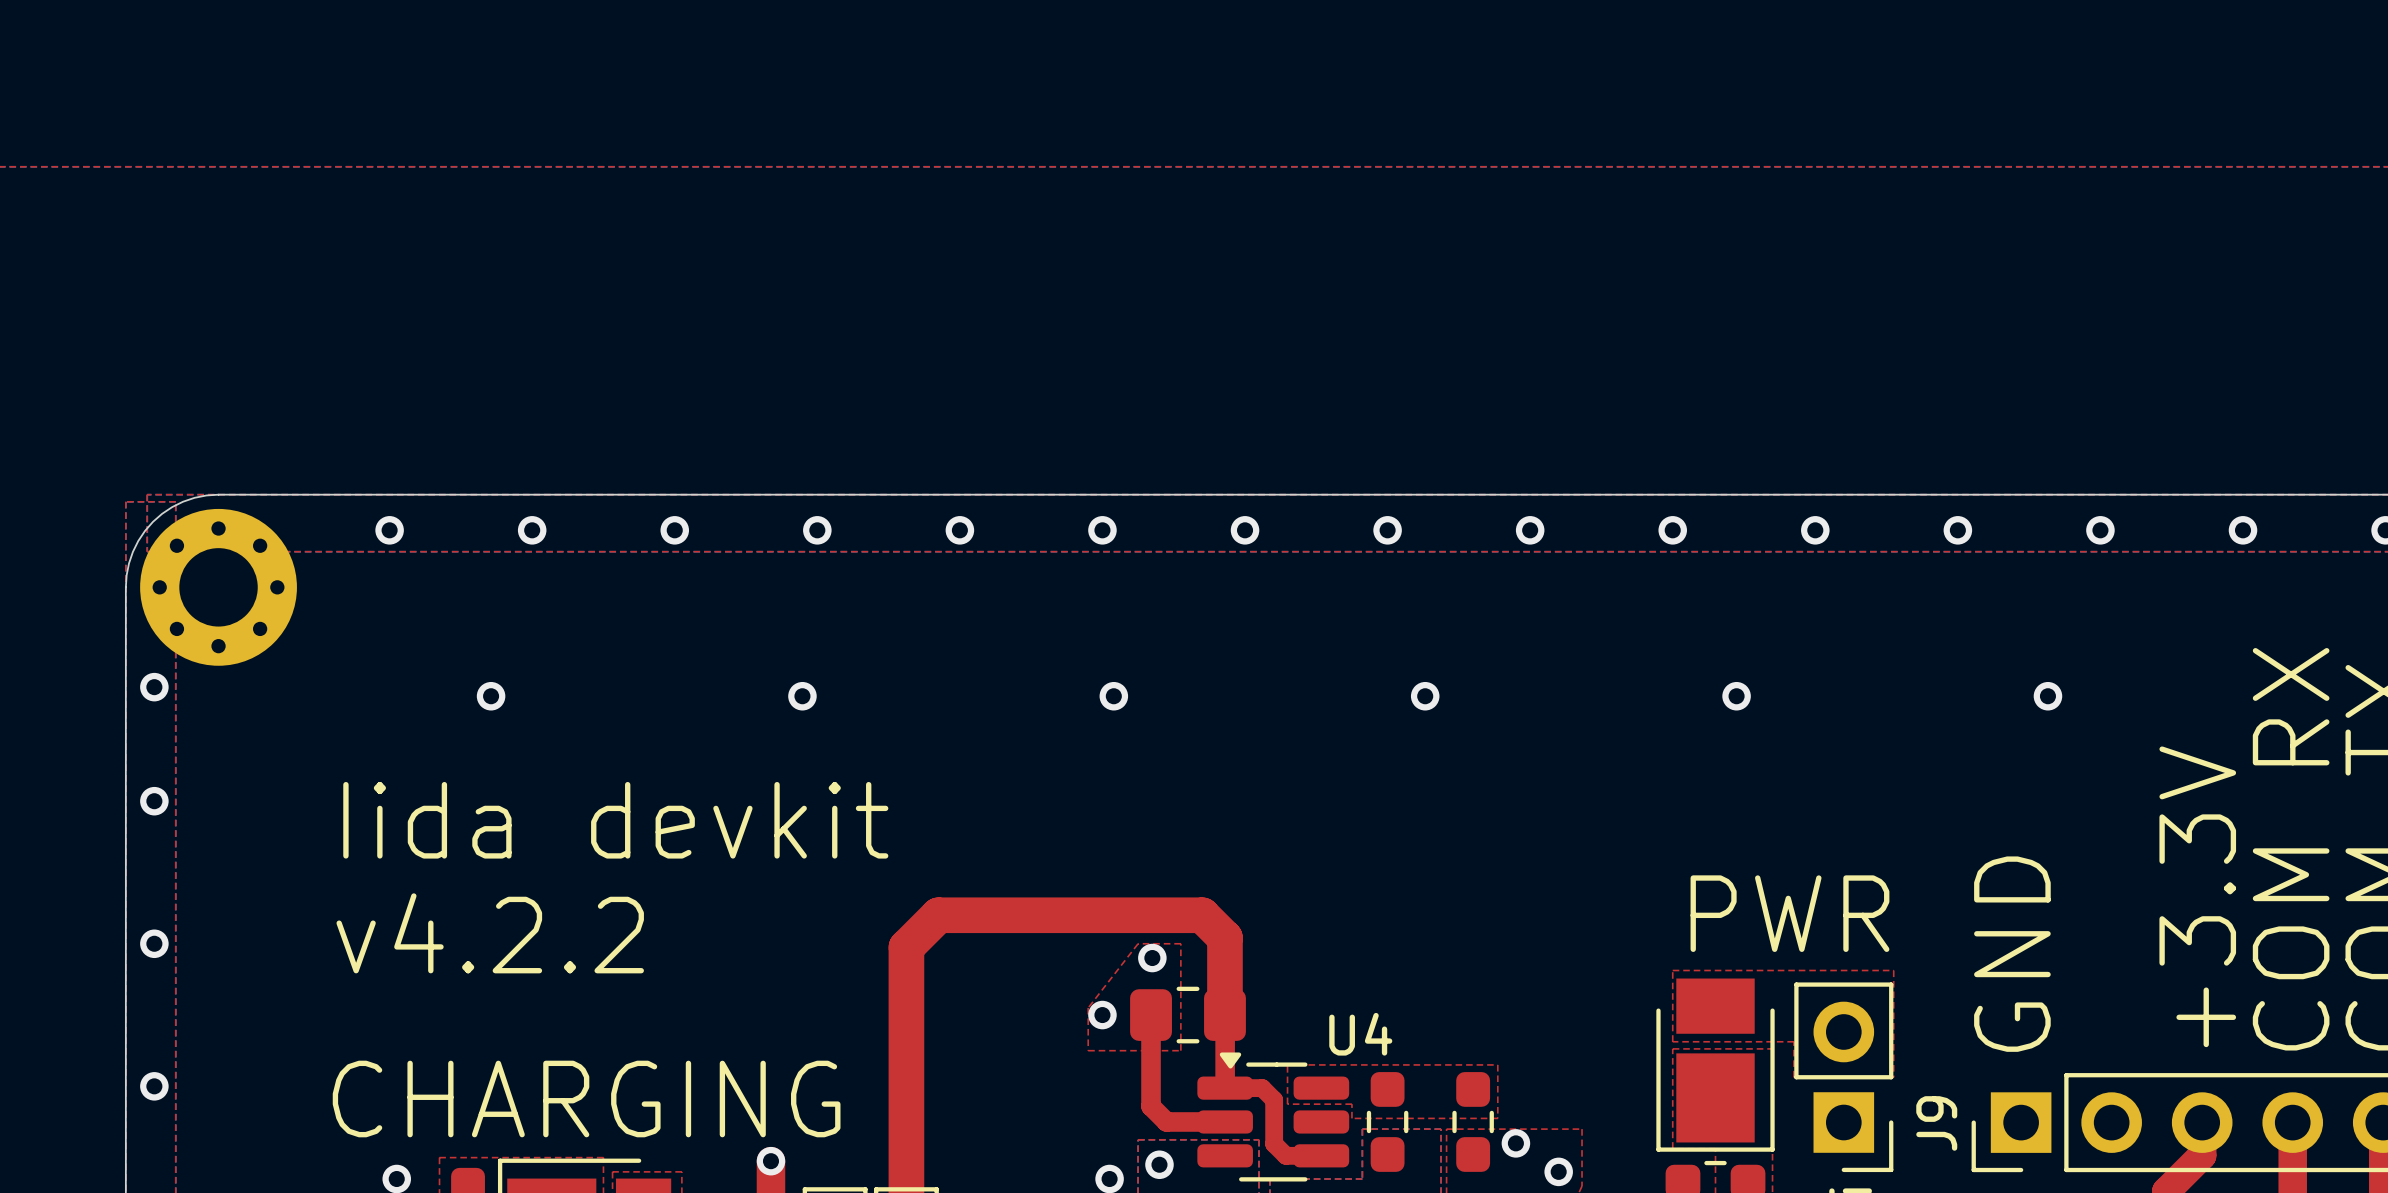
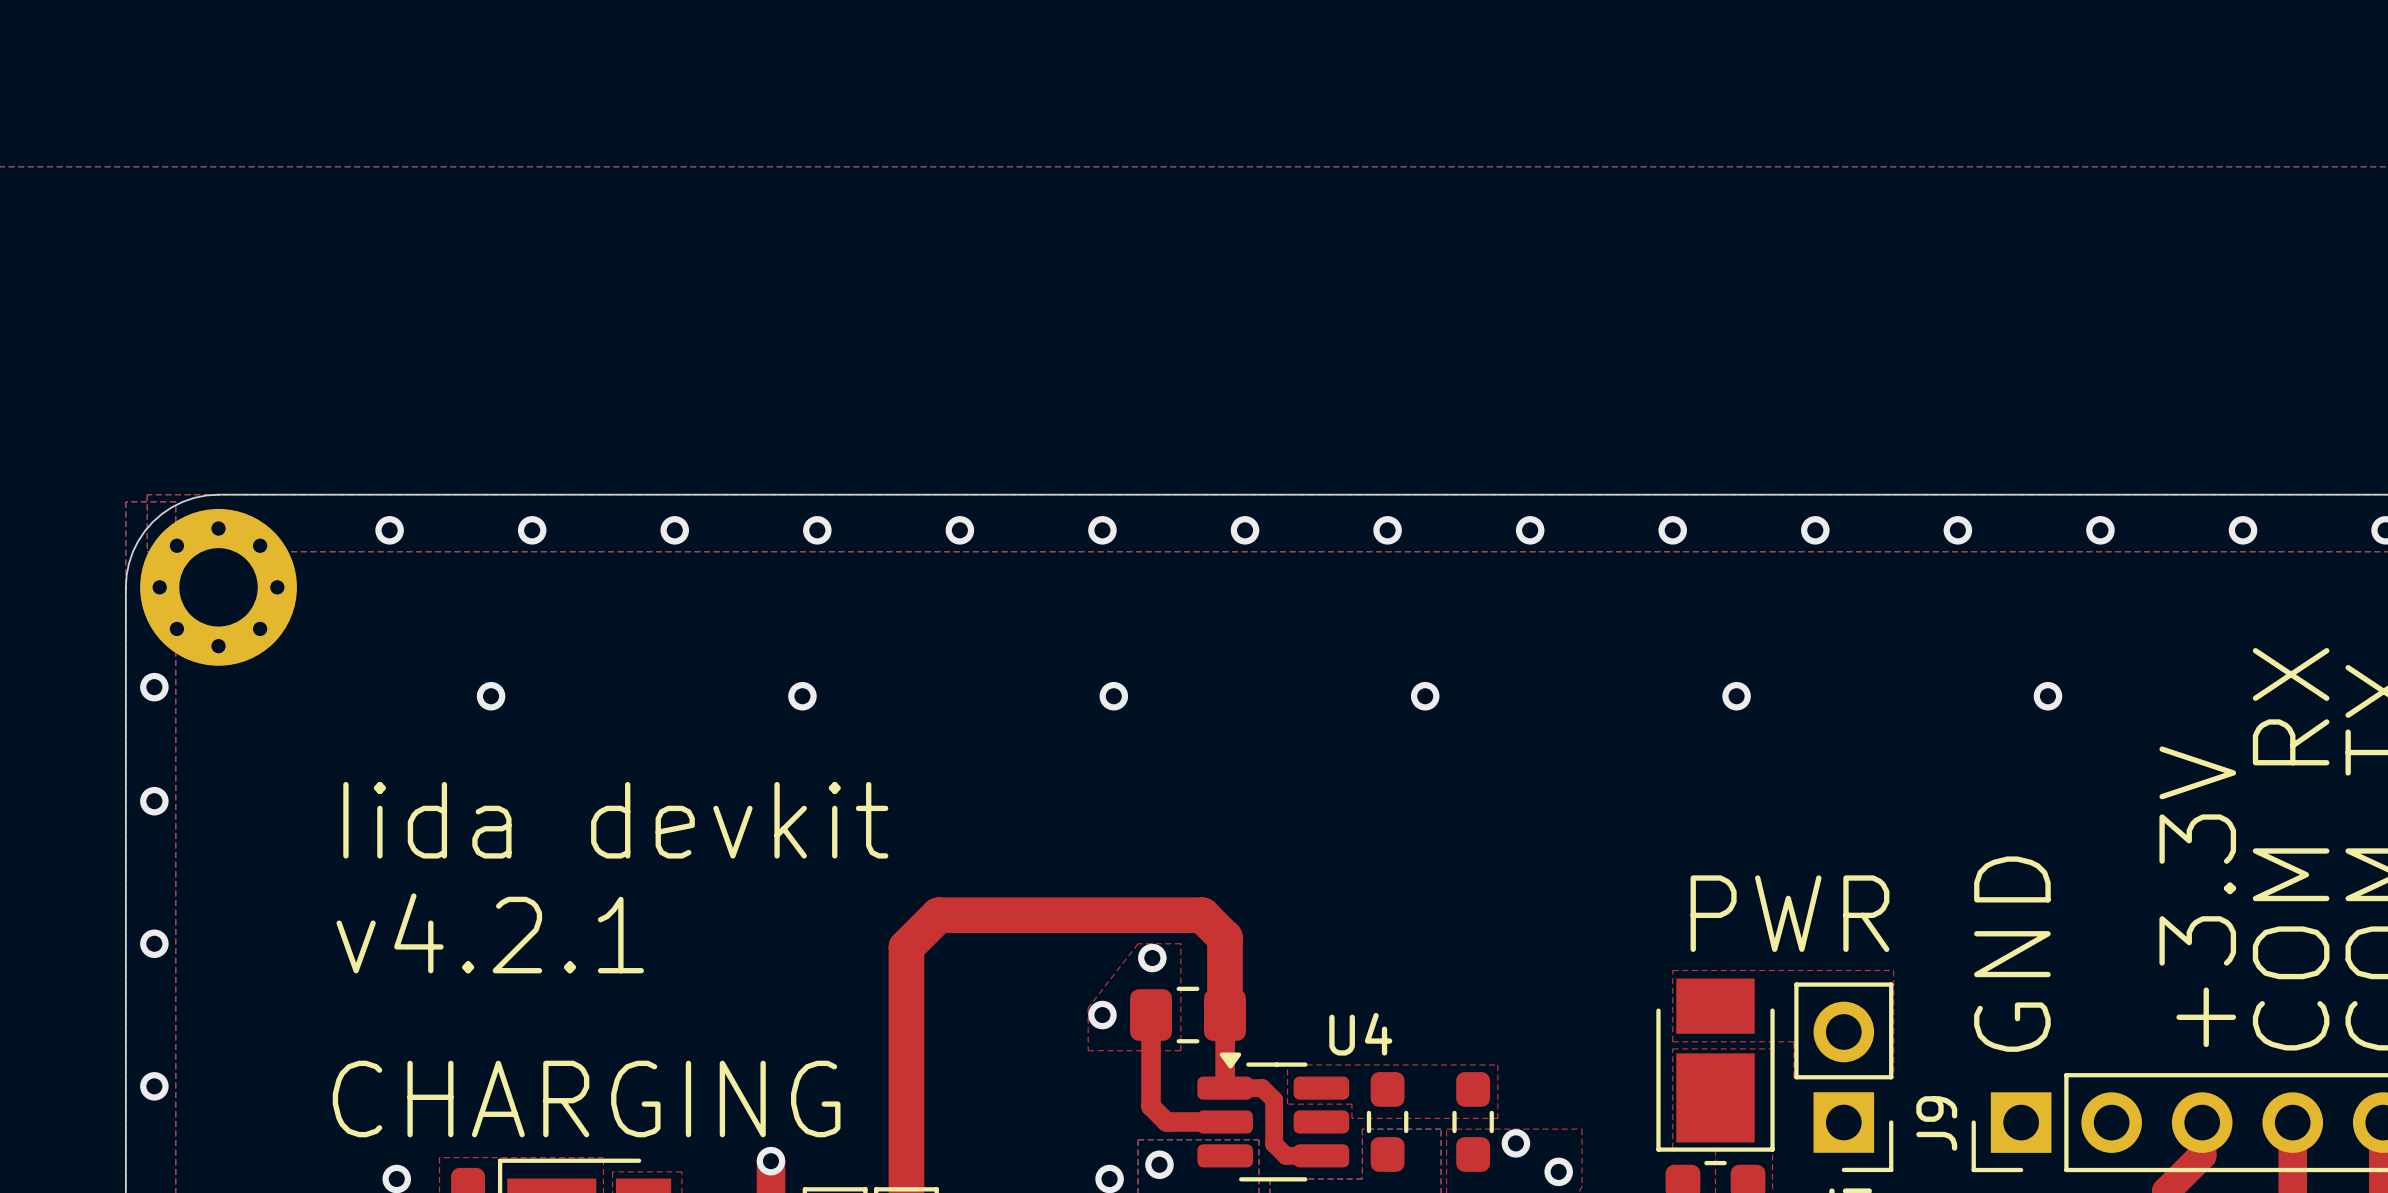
text: v4.2.2 (490, 933) -> v4.2.1 (490, 933)

